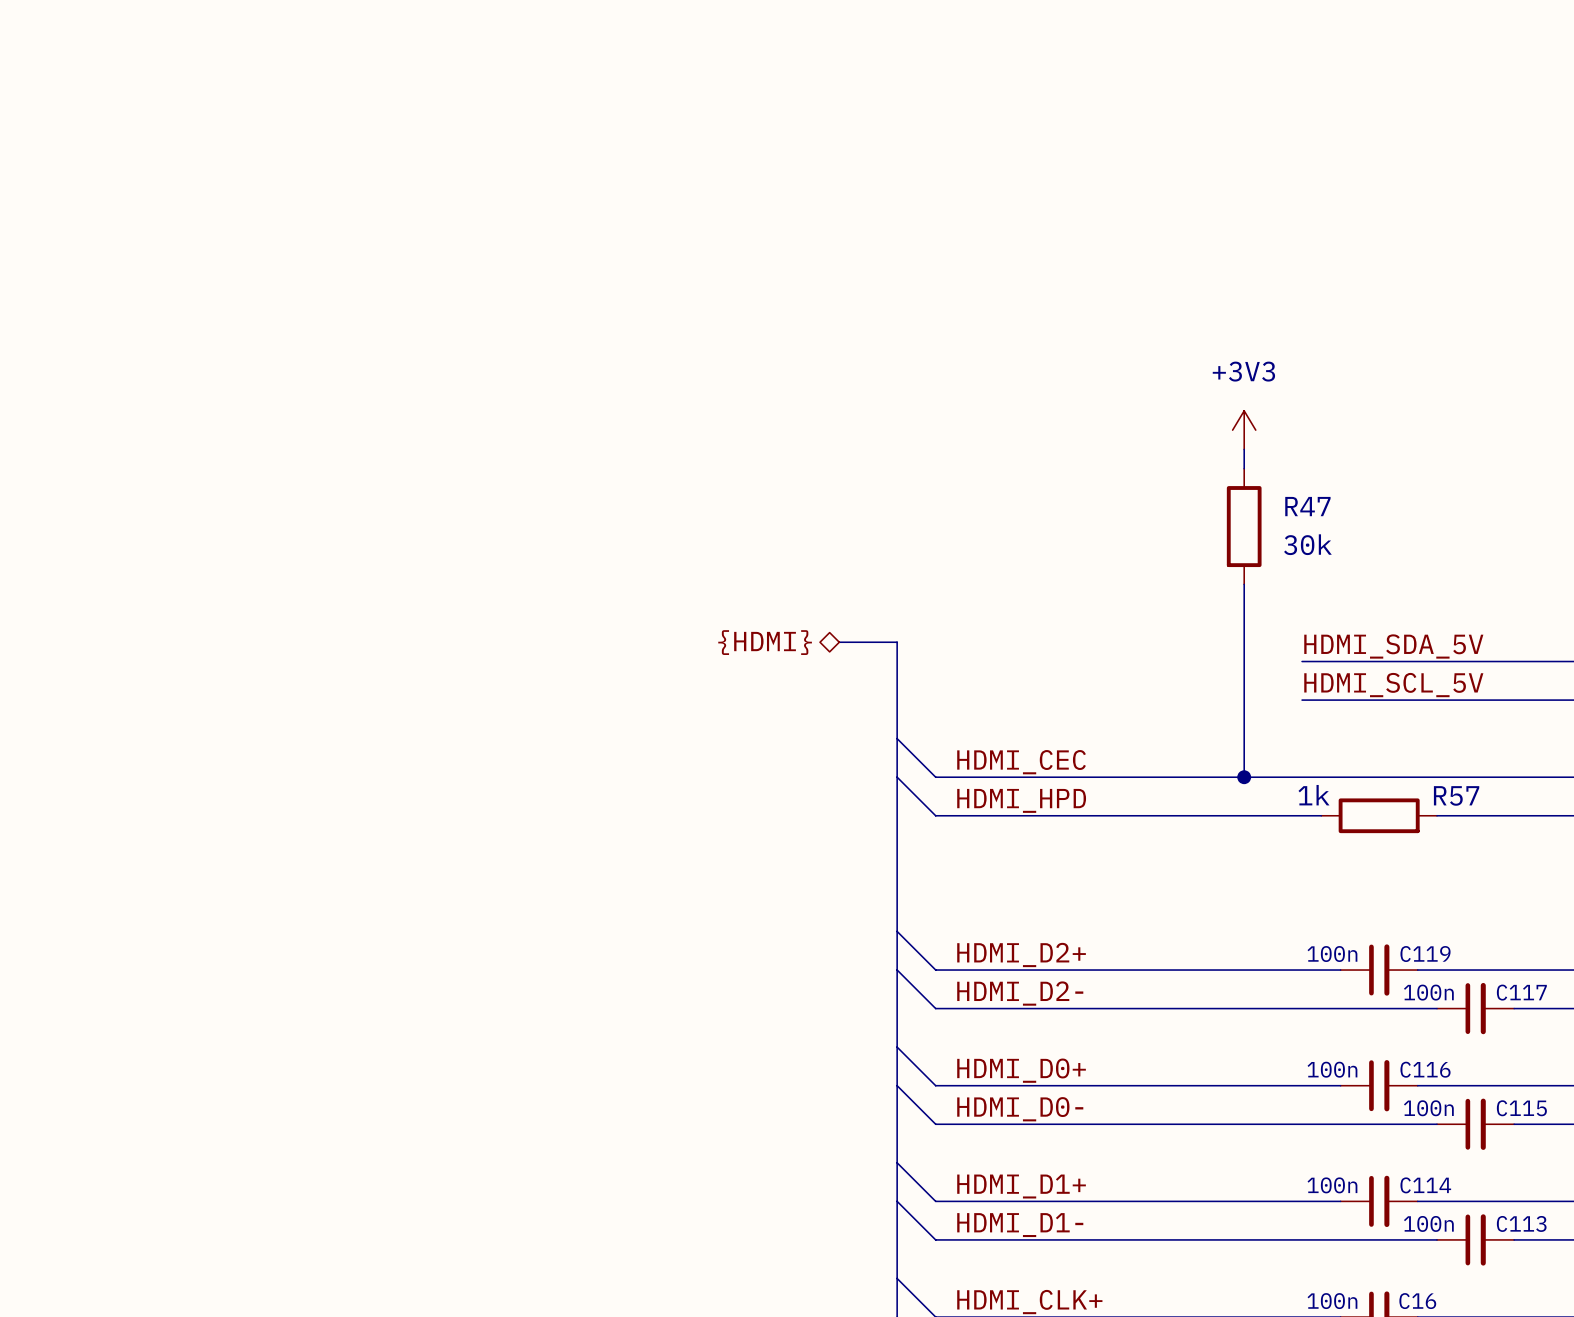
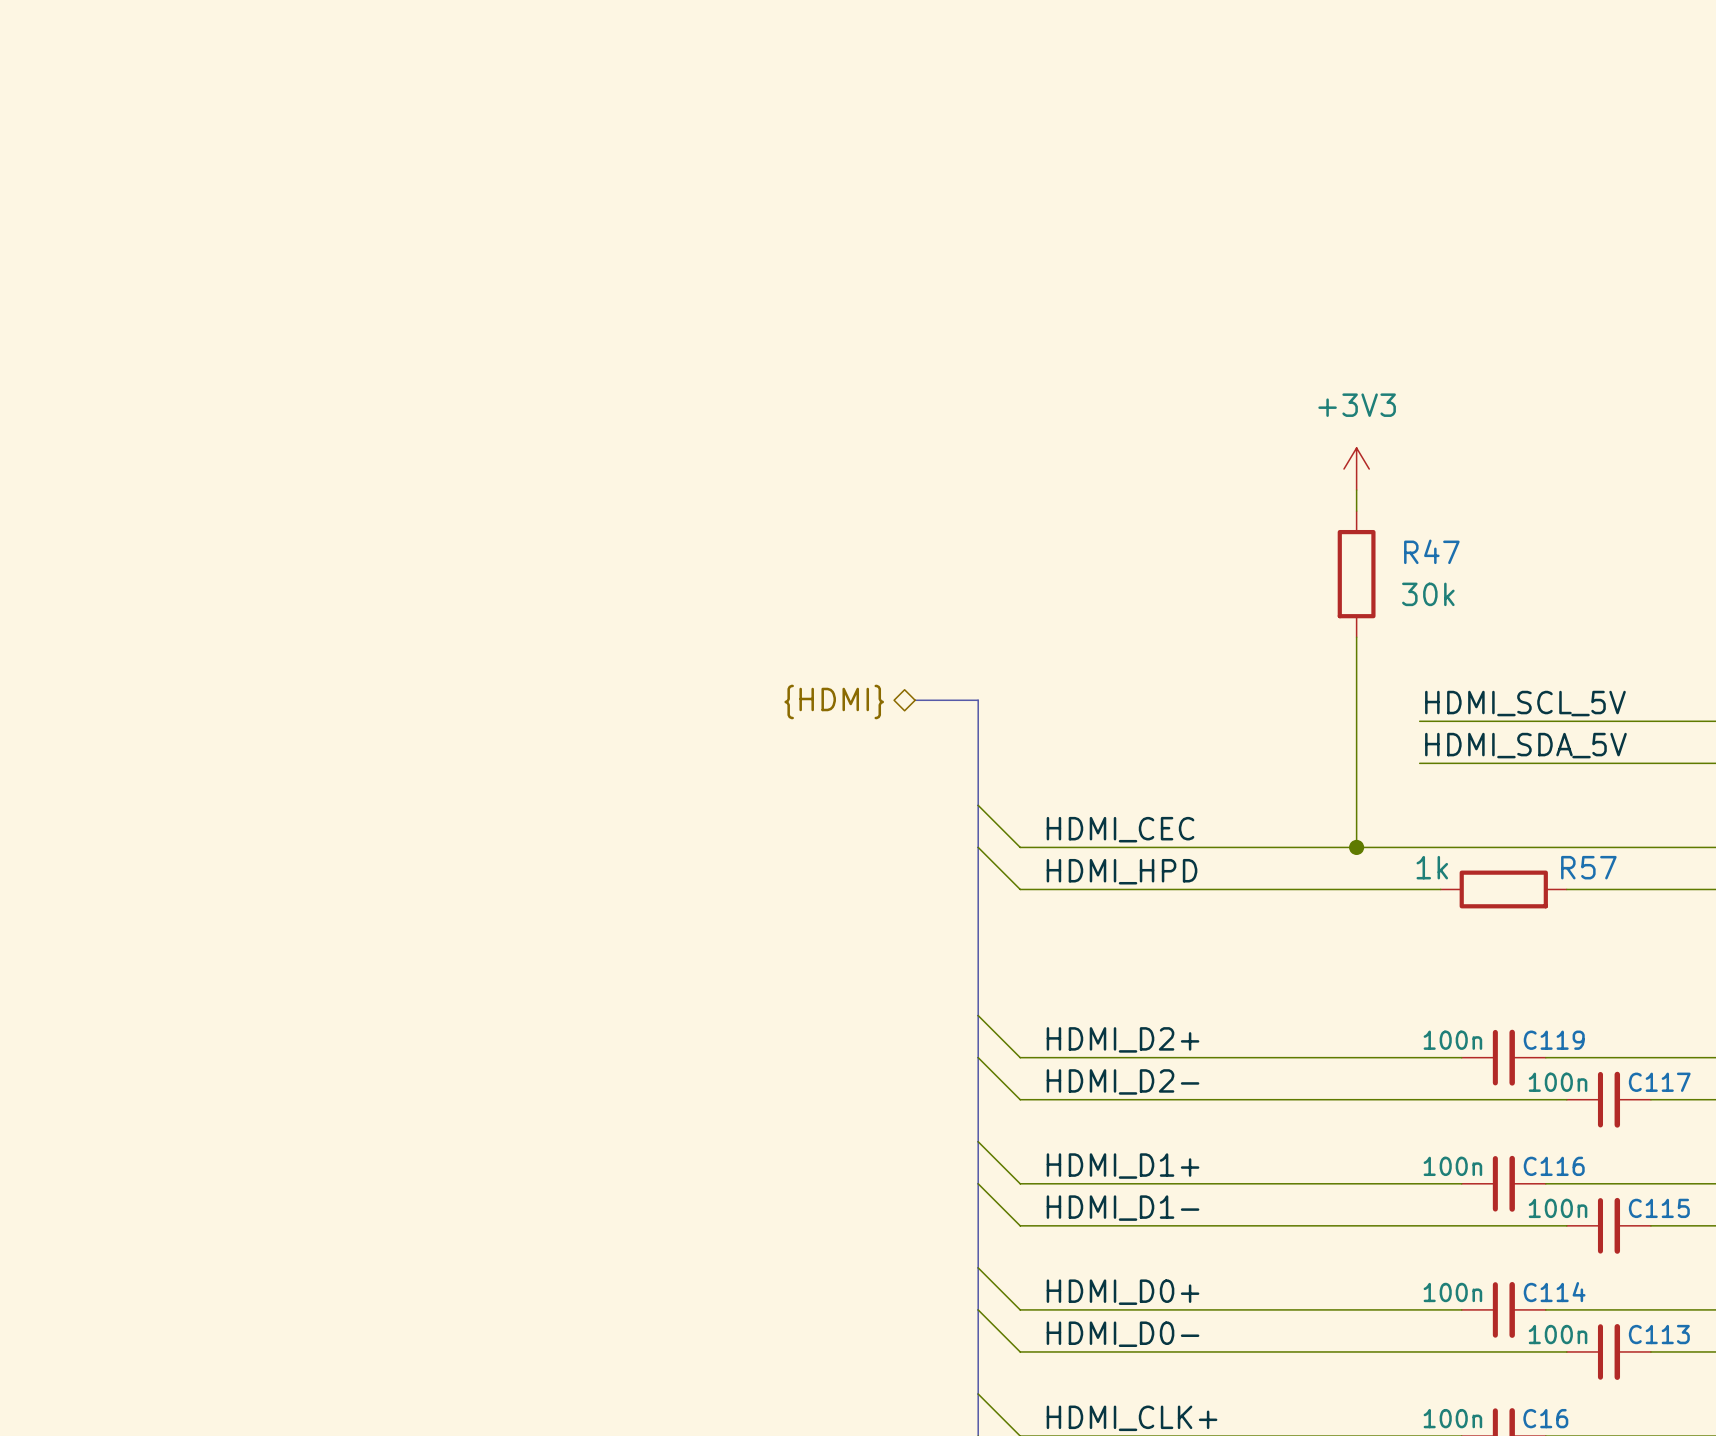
label: HDMI_SDA_5V (1393, 646) -> HDMI_SCL_5V (1525, 703)
label: HDMI_SCL_5V (1393, 685) -> HDMI_SDA_5V (1525, 745)
label: HDMI_D0+ (1021, 1070) -> HDMI_D1+ (1123, 1166)
label: HDMI_D0- (1020, 1109) -> HDMI_D1- (1123, 1208)
label: HDMI_D1+ (1021, 1186) -> HDMI_D0+ (1123, 1292)
label: HDMI_D1- (1020, 1225) -> HDMI_D0- (1123, 1334)

